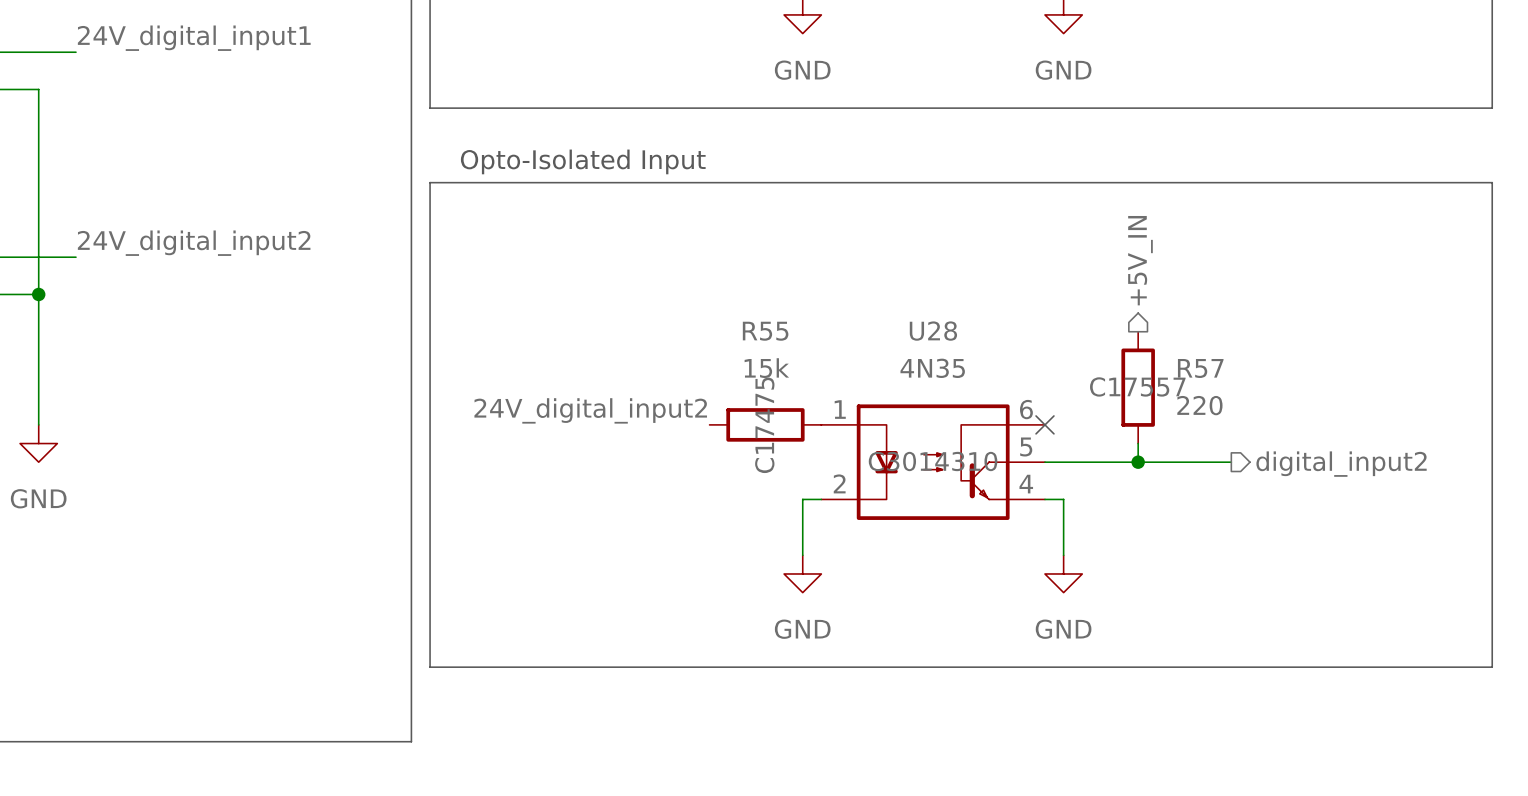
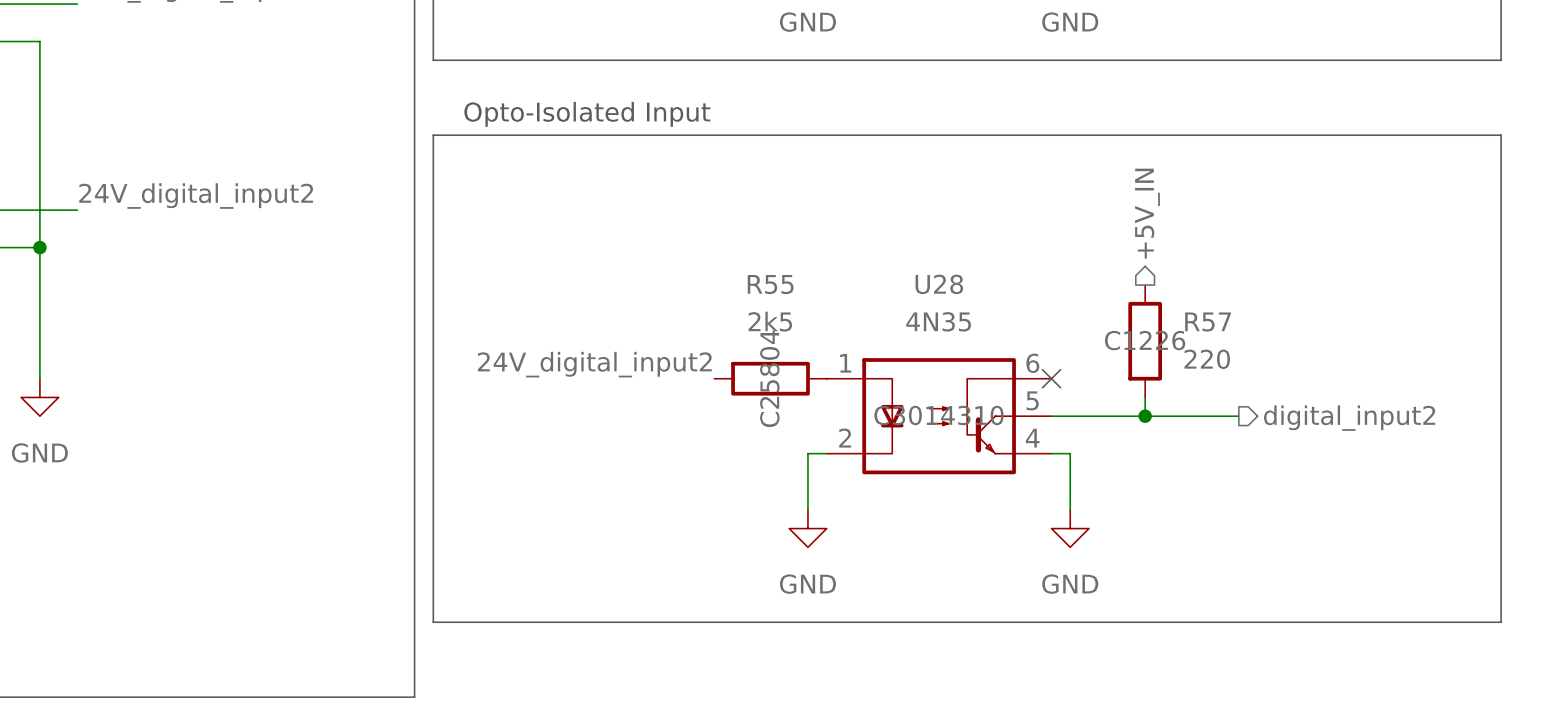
R55 value: 15k (766, 368) -> 2k5 (770, 321)
R57 text: C17557 (1137, 386) -> C1226 (1145, 340)
R55 text: C17475 (764, 425) -> C25804 (769, 378)

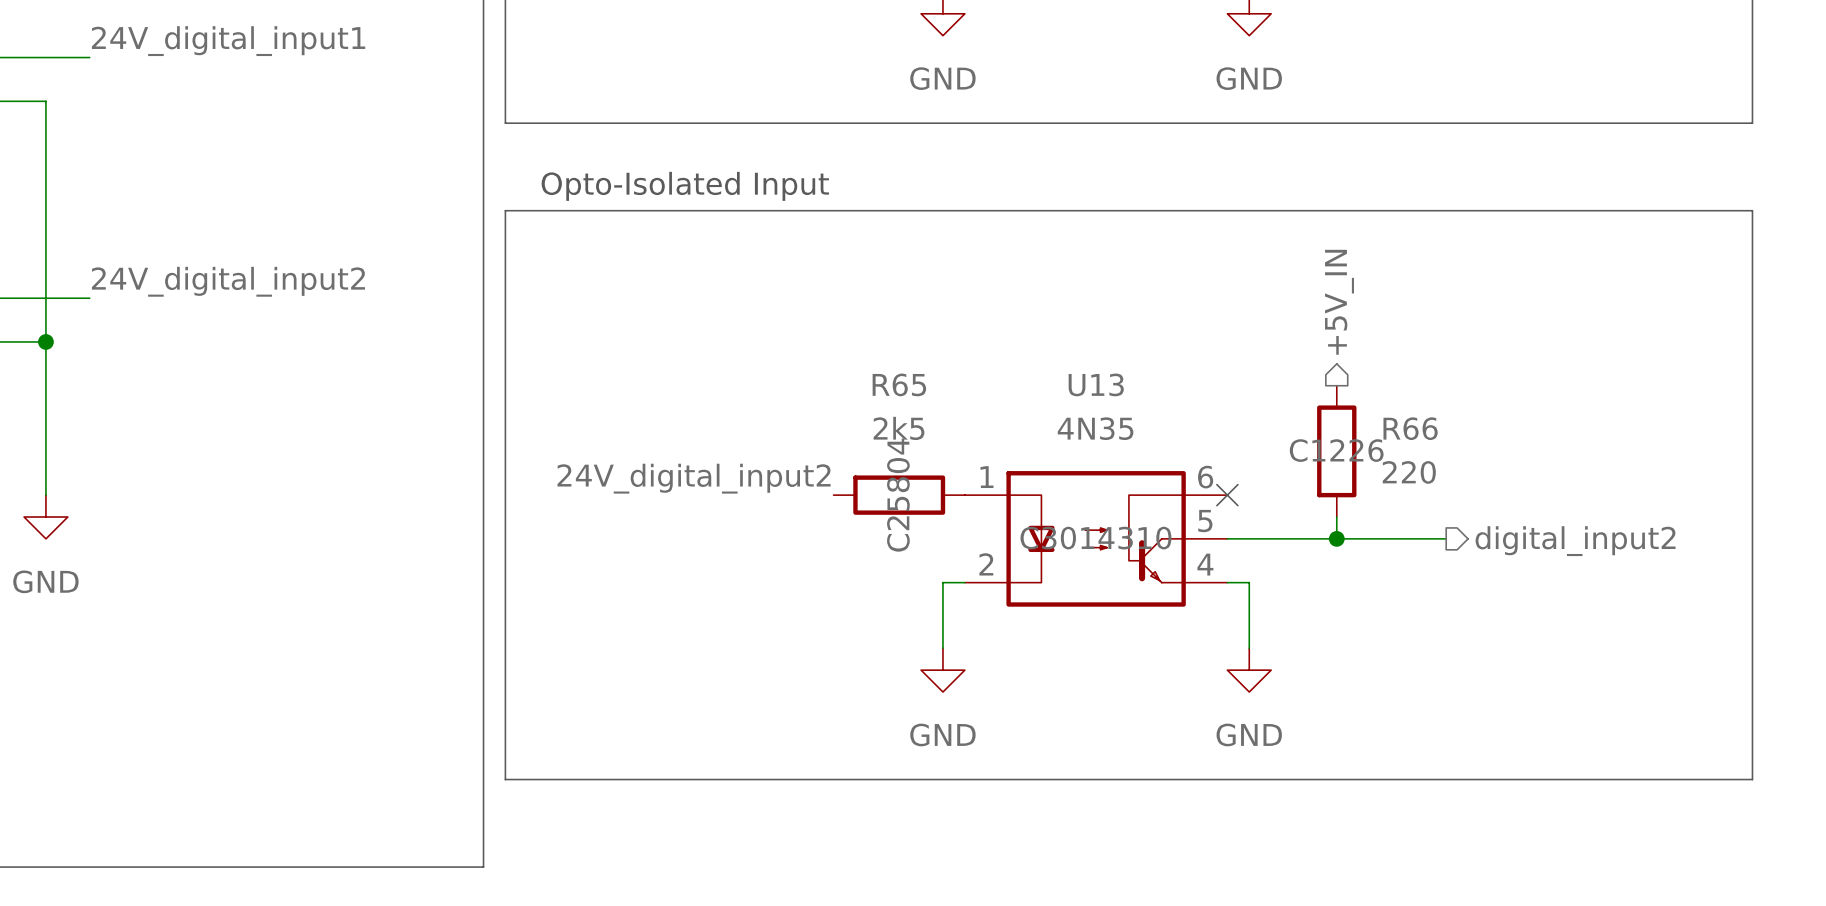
R55 name: R55 (770, 284) -> R65 (899, 384)
U28 name: U28 (939, 284) -> U13 (1096, 384)
R57 name: R57 (1208, 322) -> R66 (1410, 428)

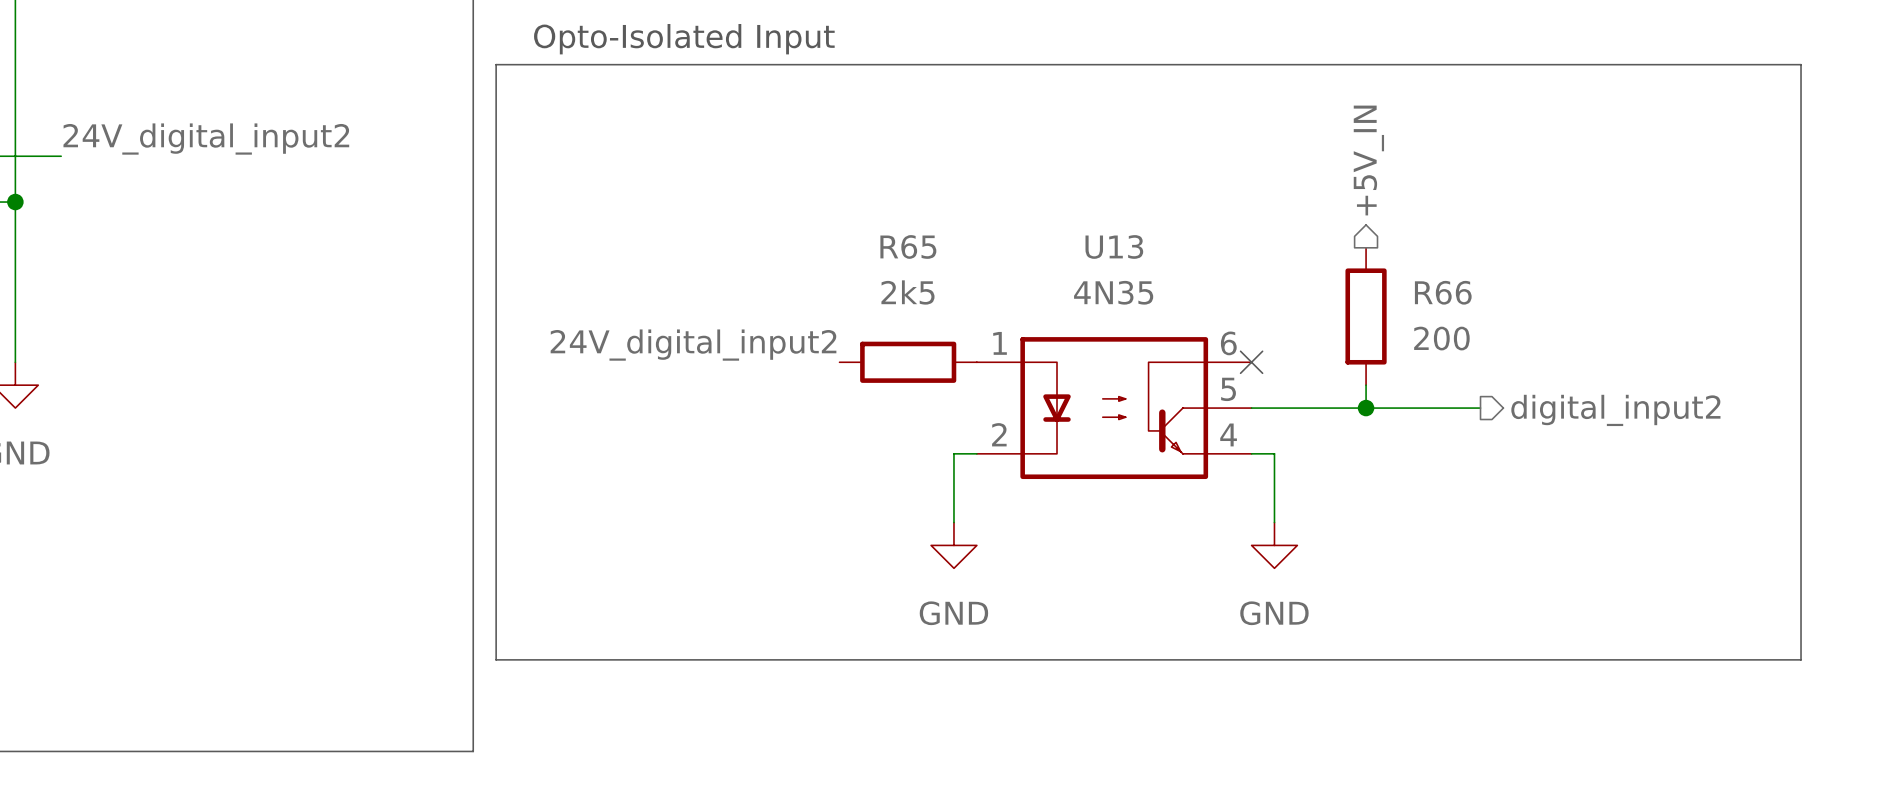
R66 text: C1226 (1336, 450) -> none
R66 value: 220 (1409, 472) -> 200 (1441, 338)
R65 text: C25804 (898, 495) -> none
U13 text: C3014310 (1095, 538) -> none

